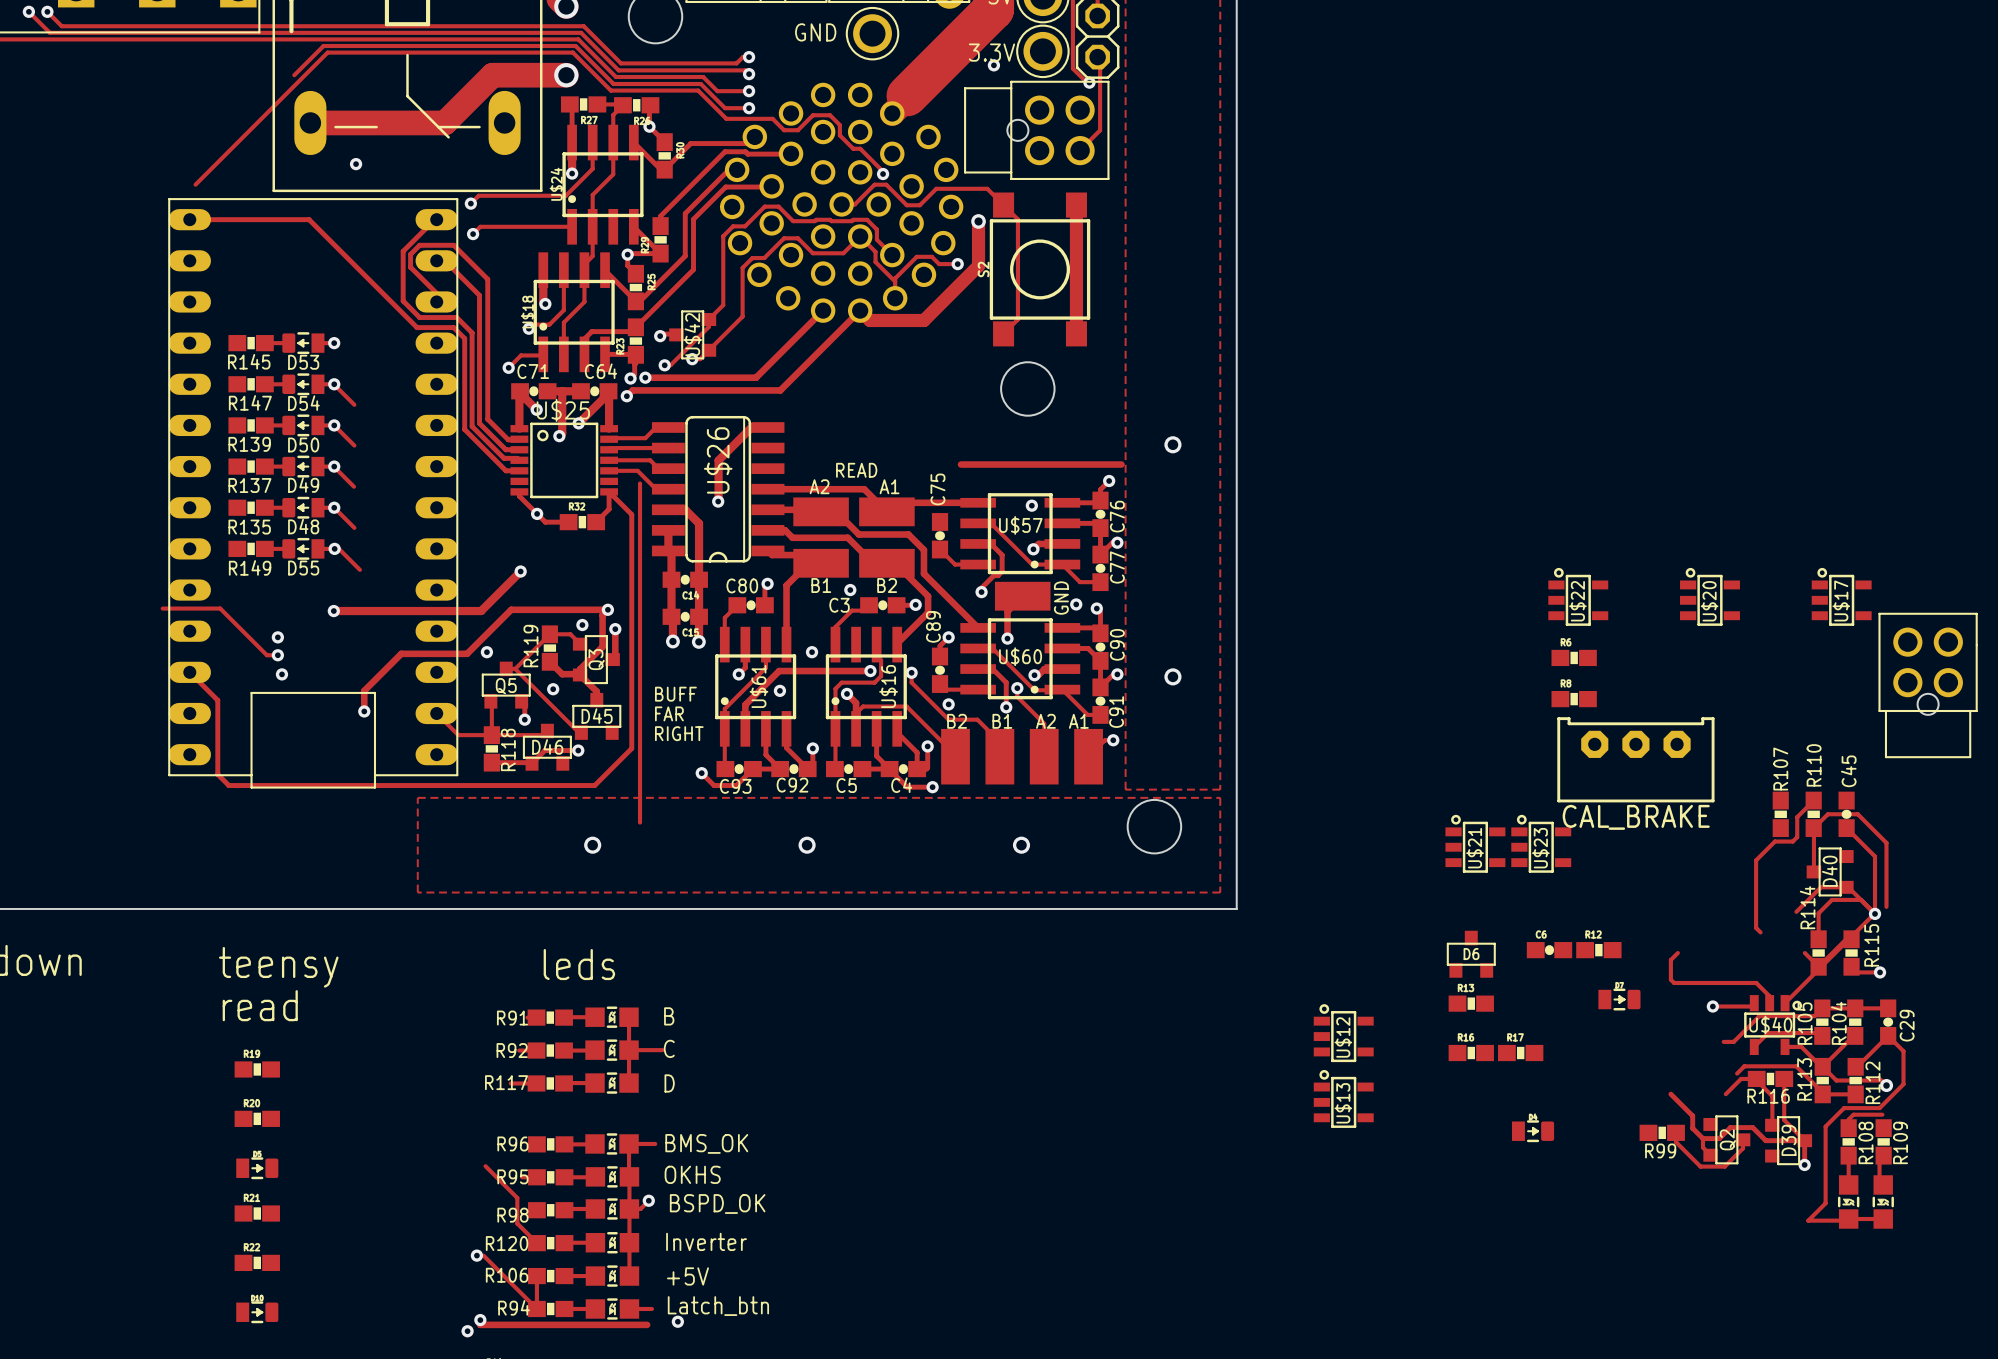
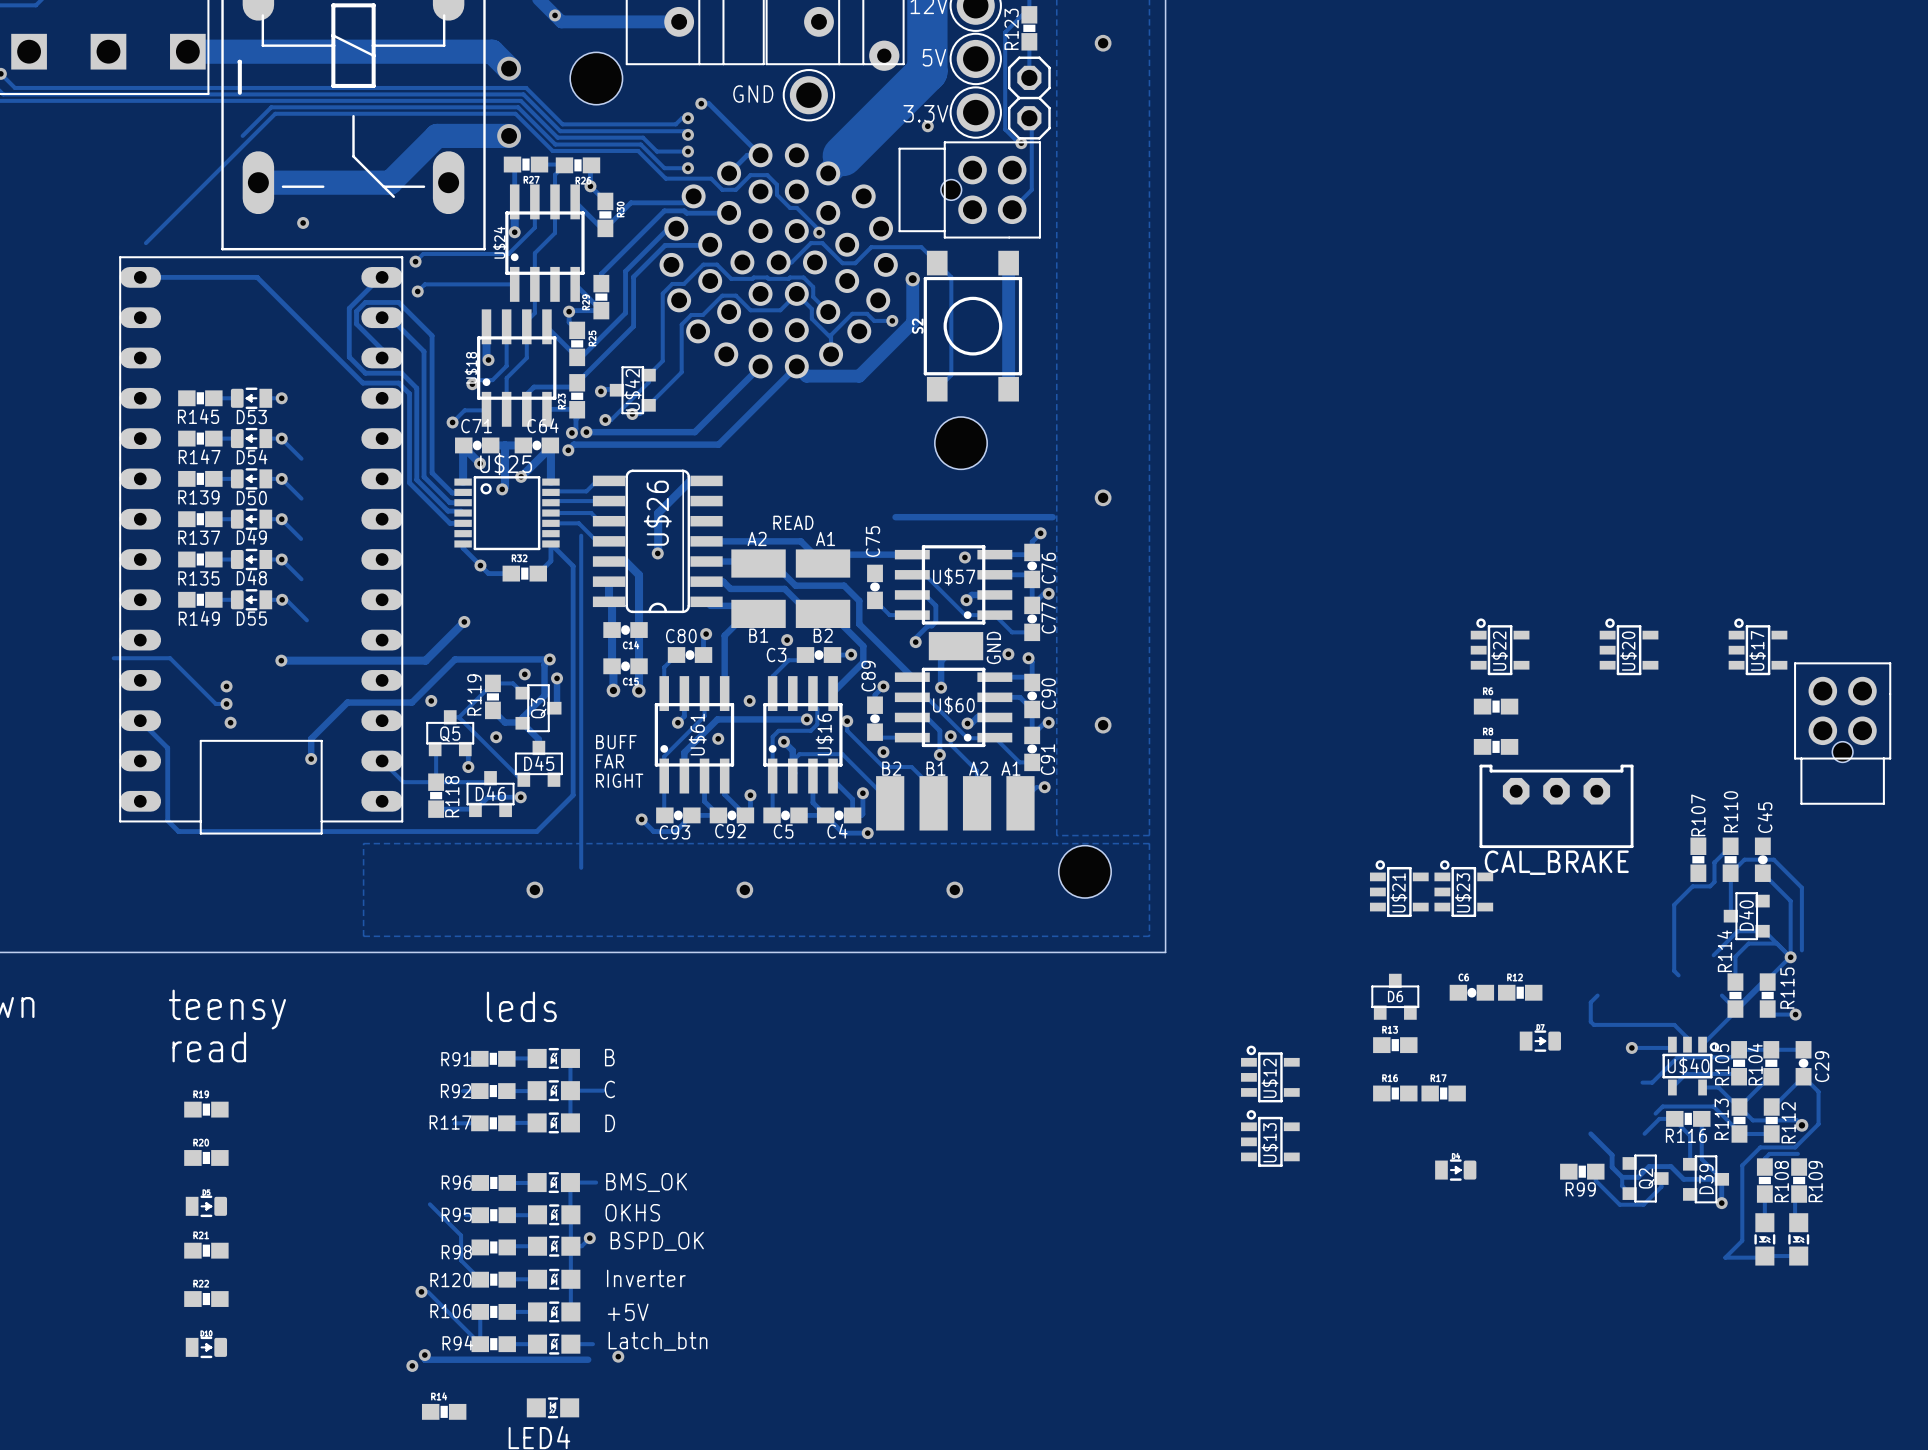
track: none -> (701, 103) (708, 103) (760, 155) (747, 155) (729, 173)
via: none -> (701, 103)

